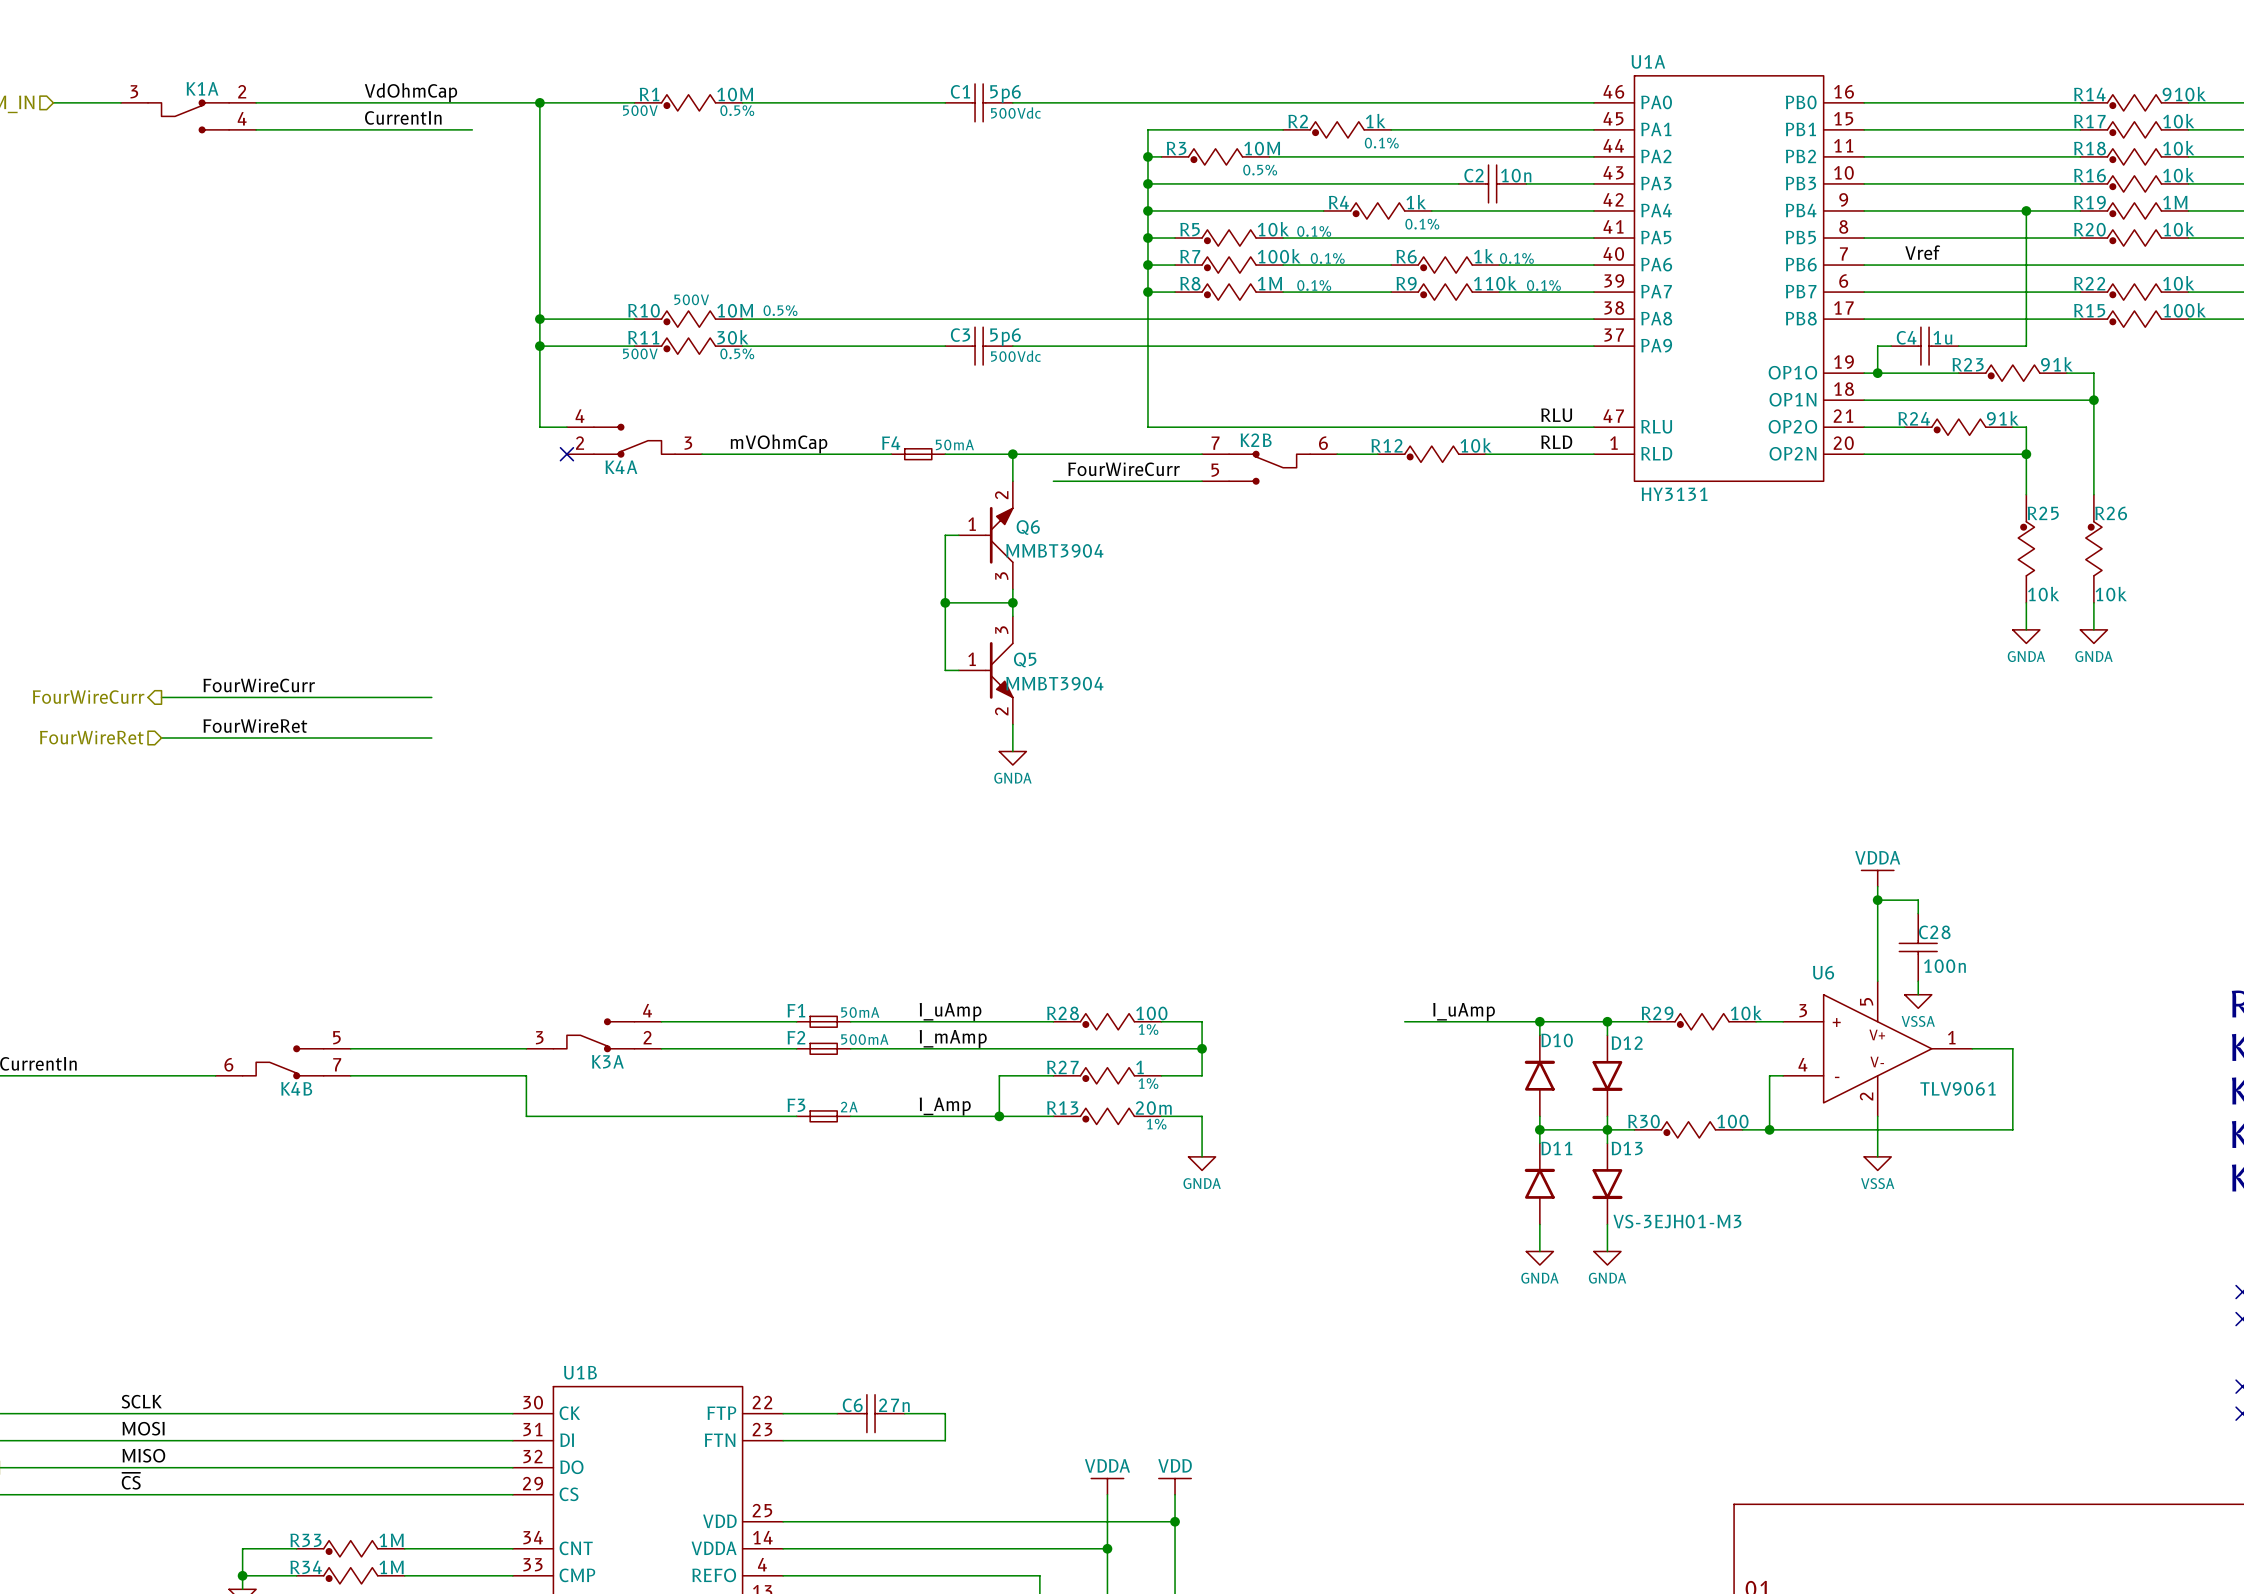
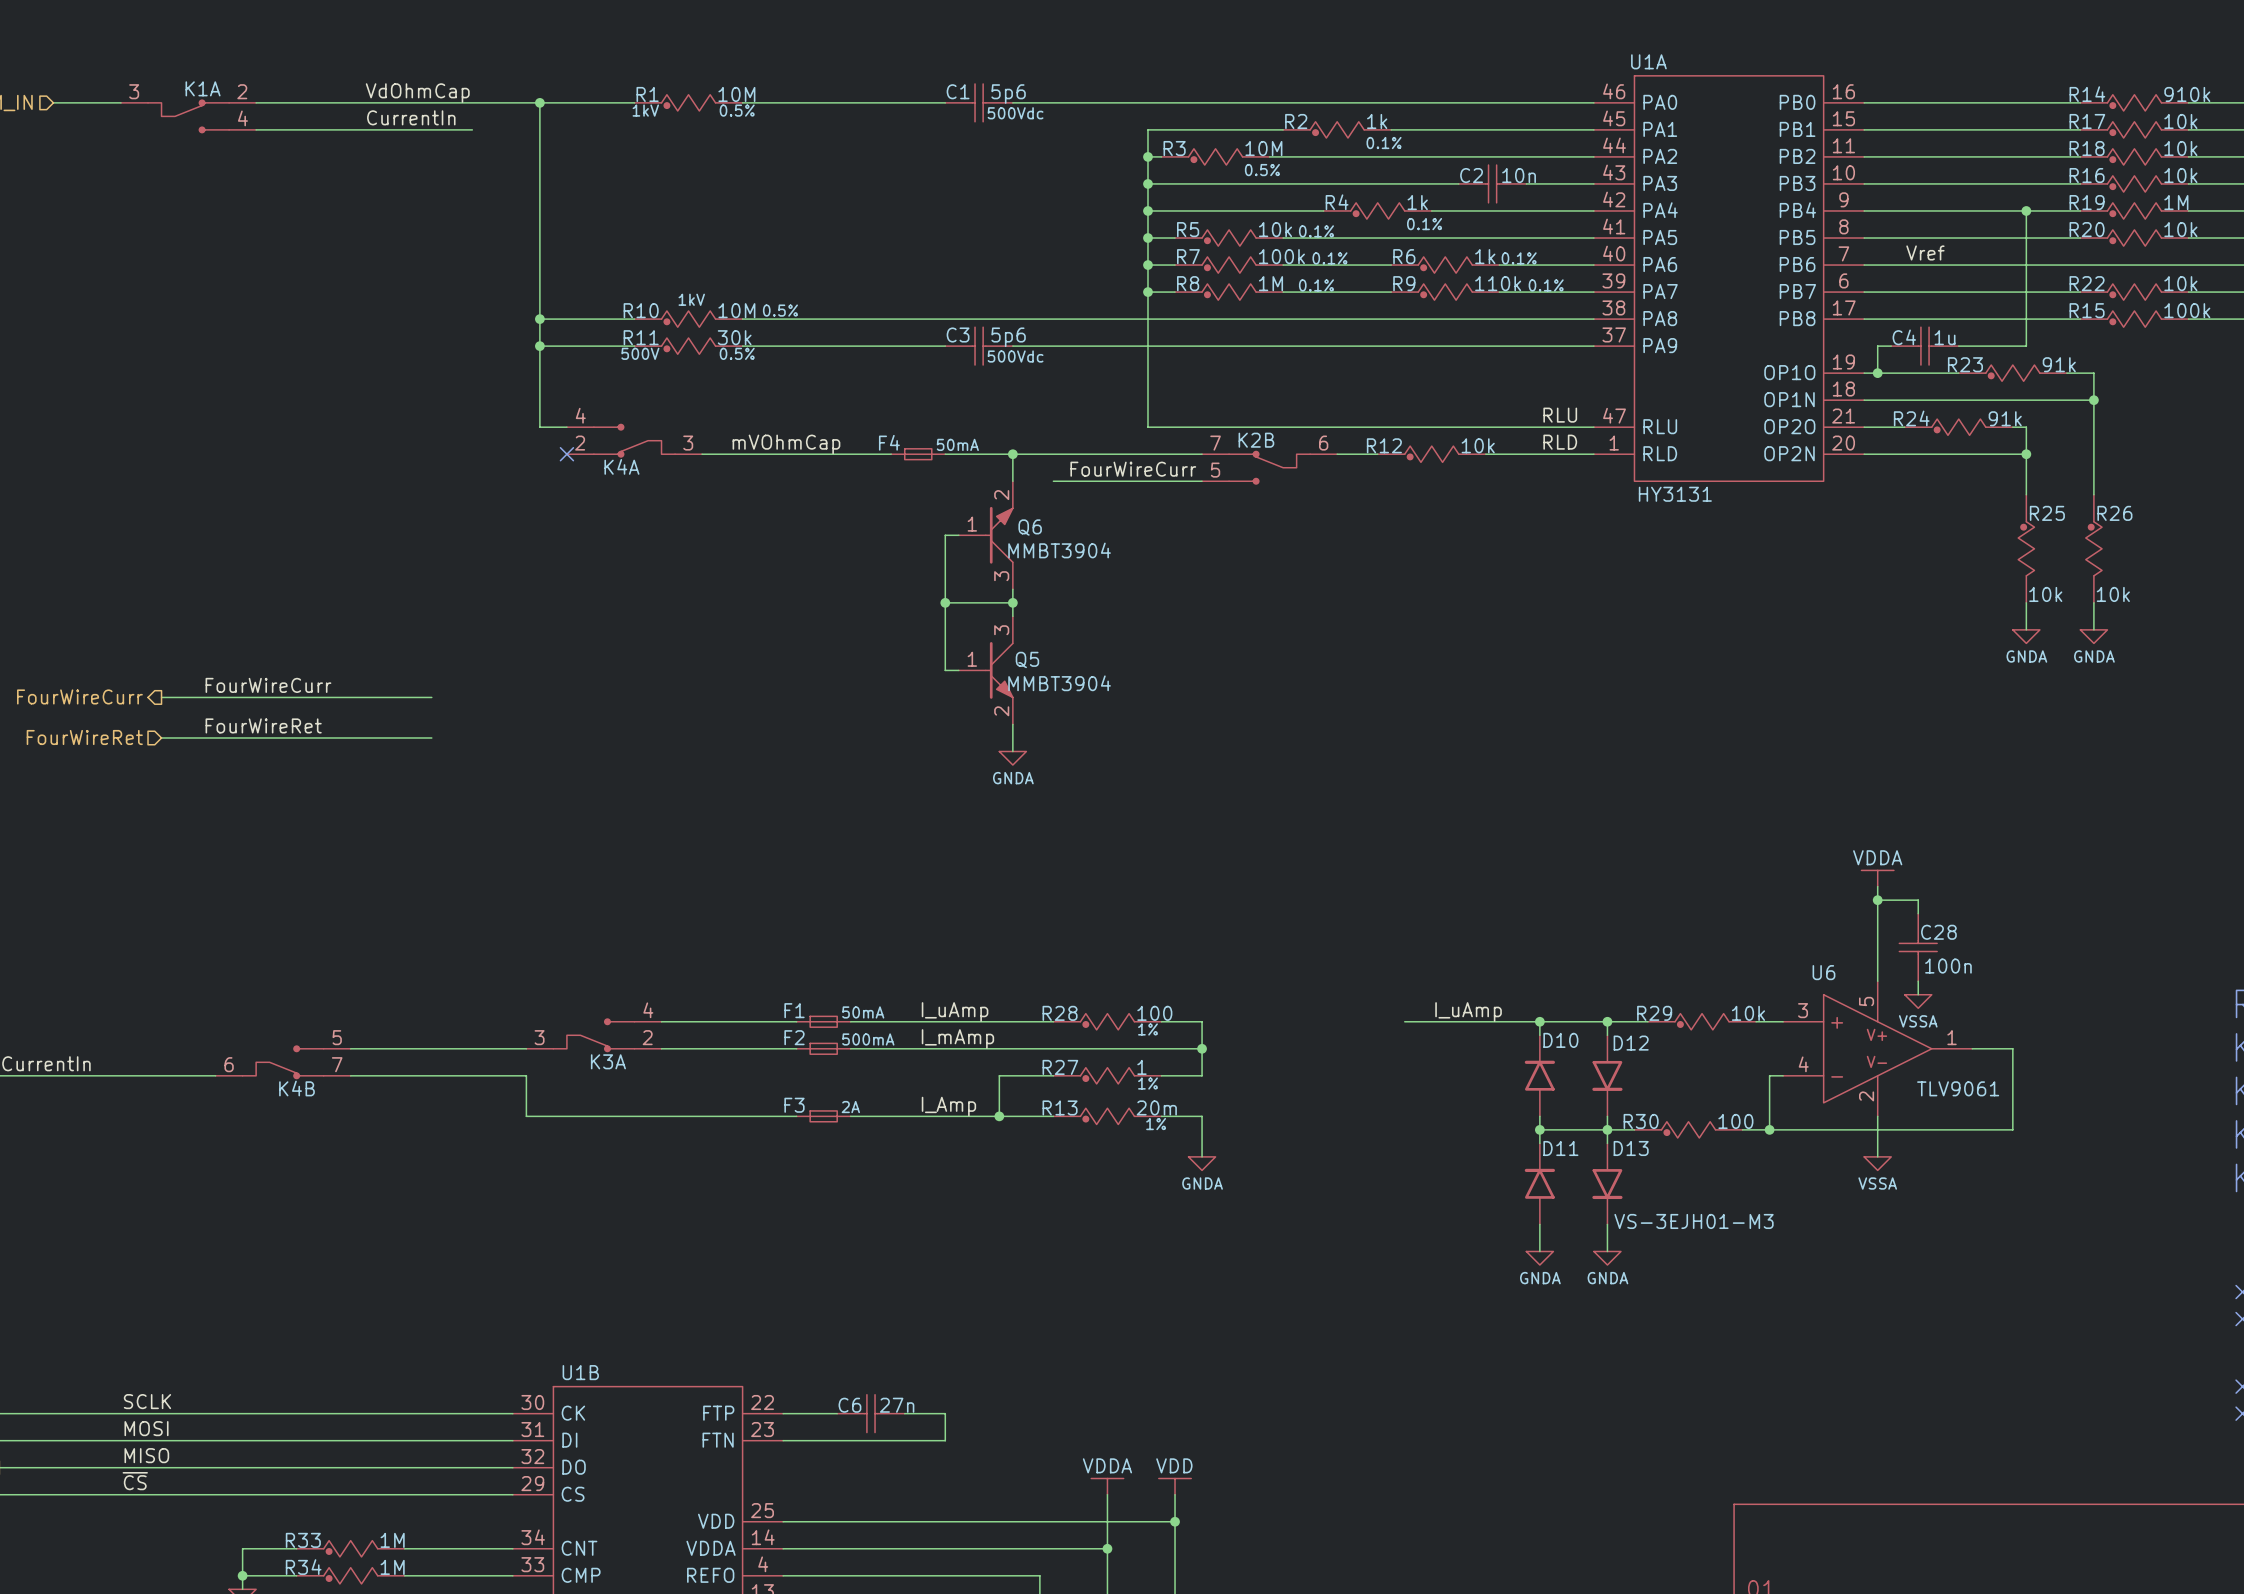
R1 text: 500V (640, 110) -> 1kV (645, 110)
R10 text: 500V (691, 299) -> 1kV (691, 299)

